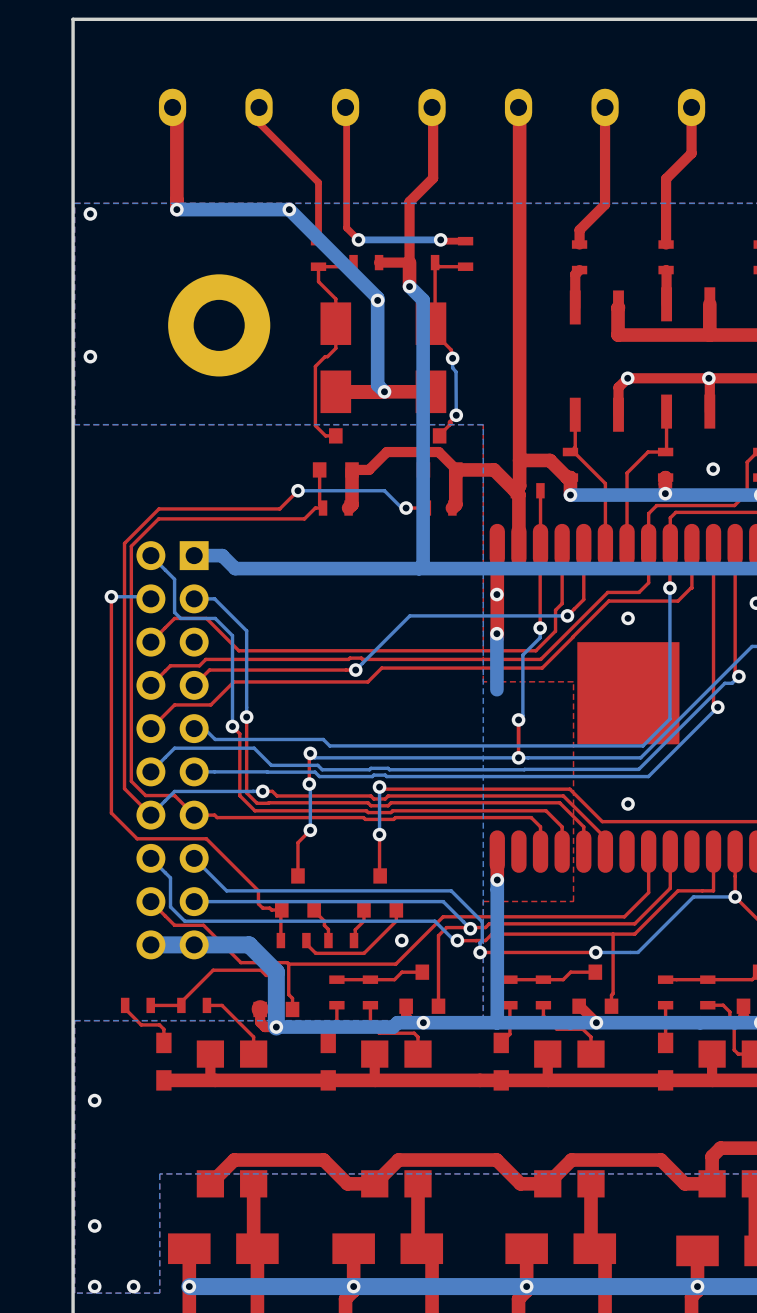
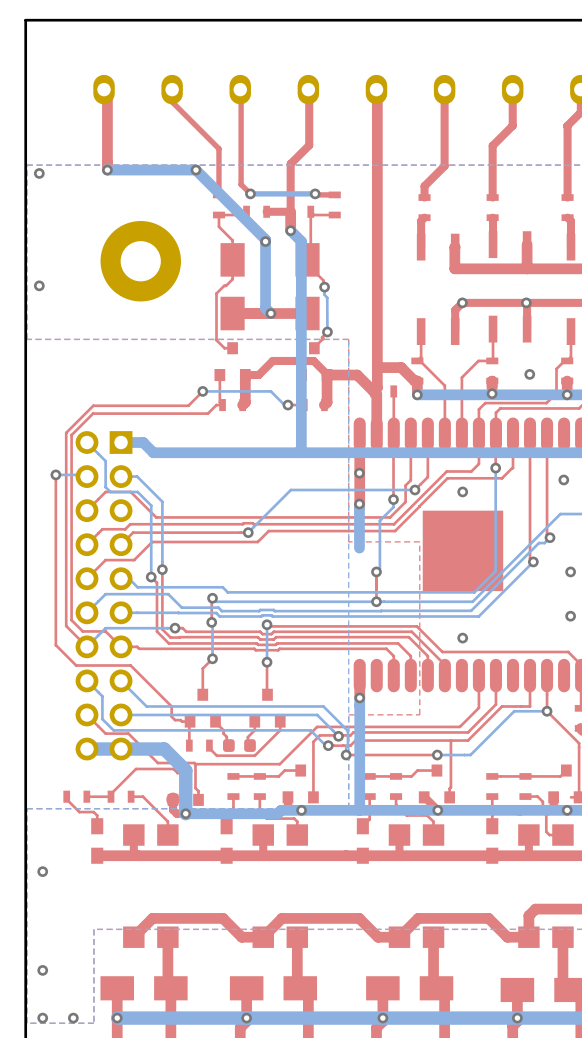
part footprint: [324, 932, 359, 949] -> [223, 739, 256, 752]
via: (401, 940) -> none

